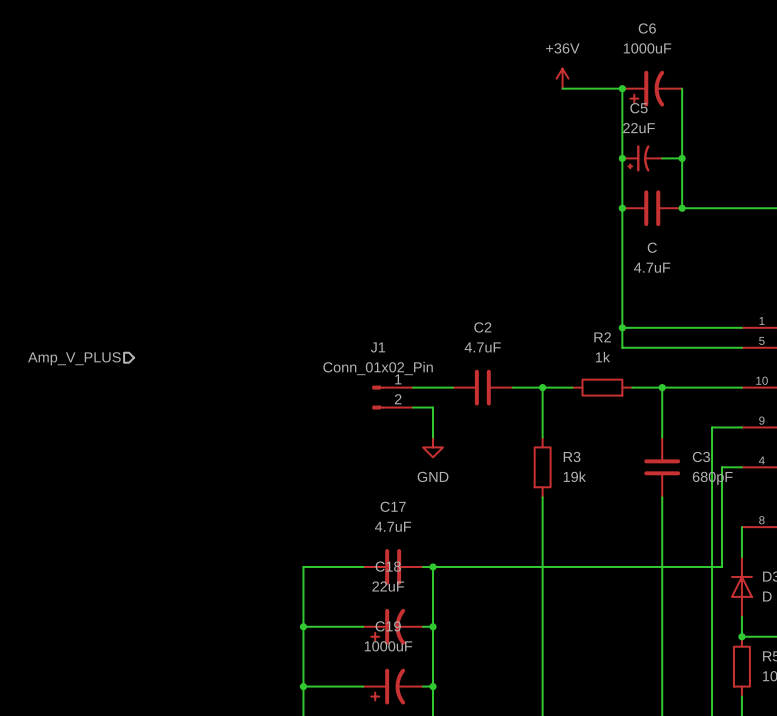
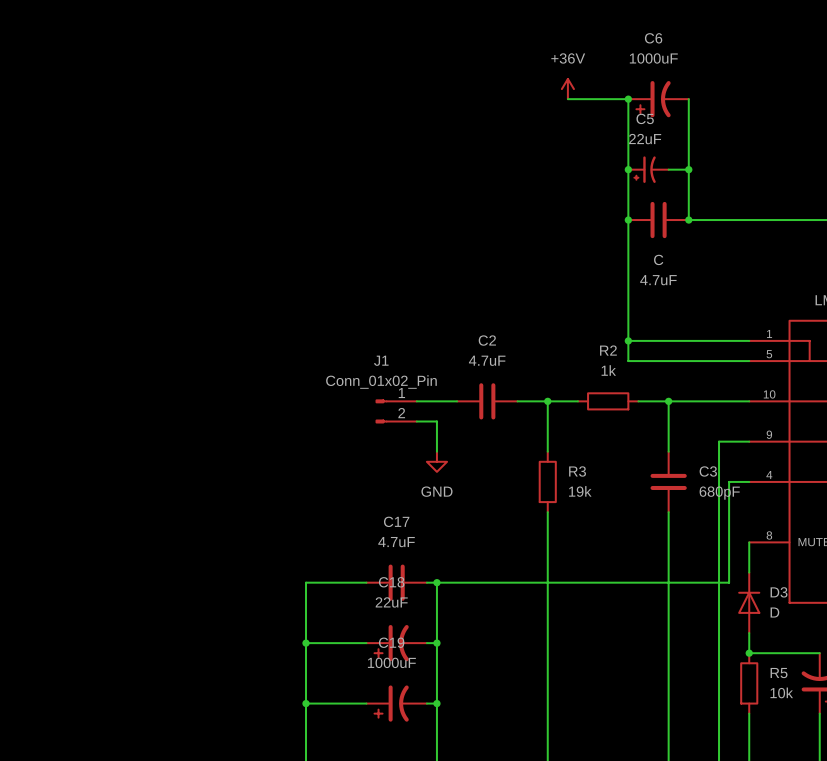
hierarchical label: Amp_V_PLUS (74, 358) -> none

